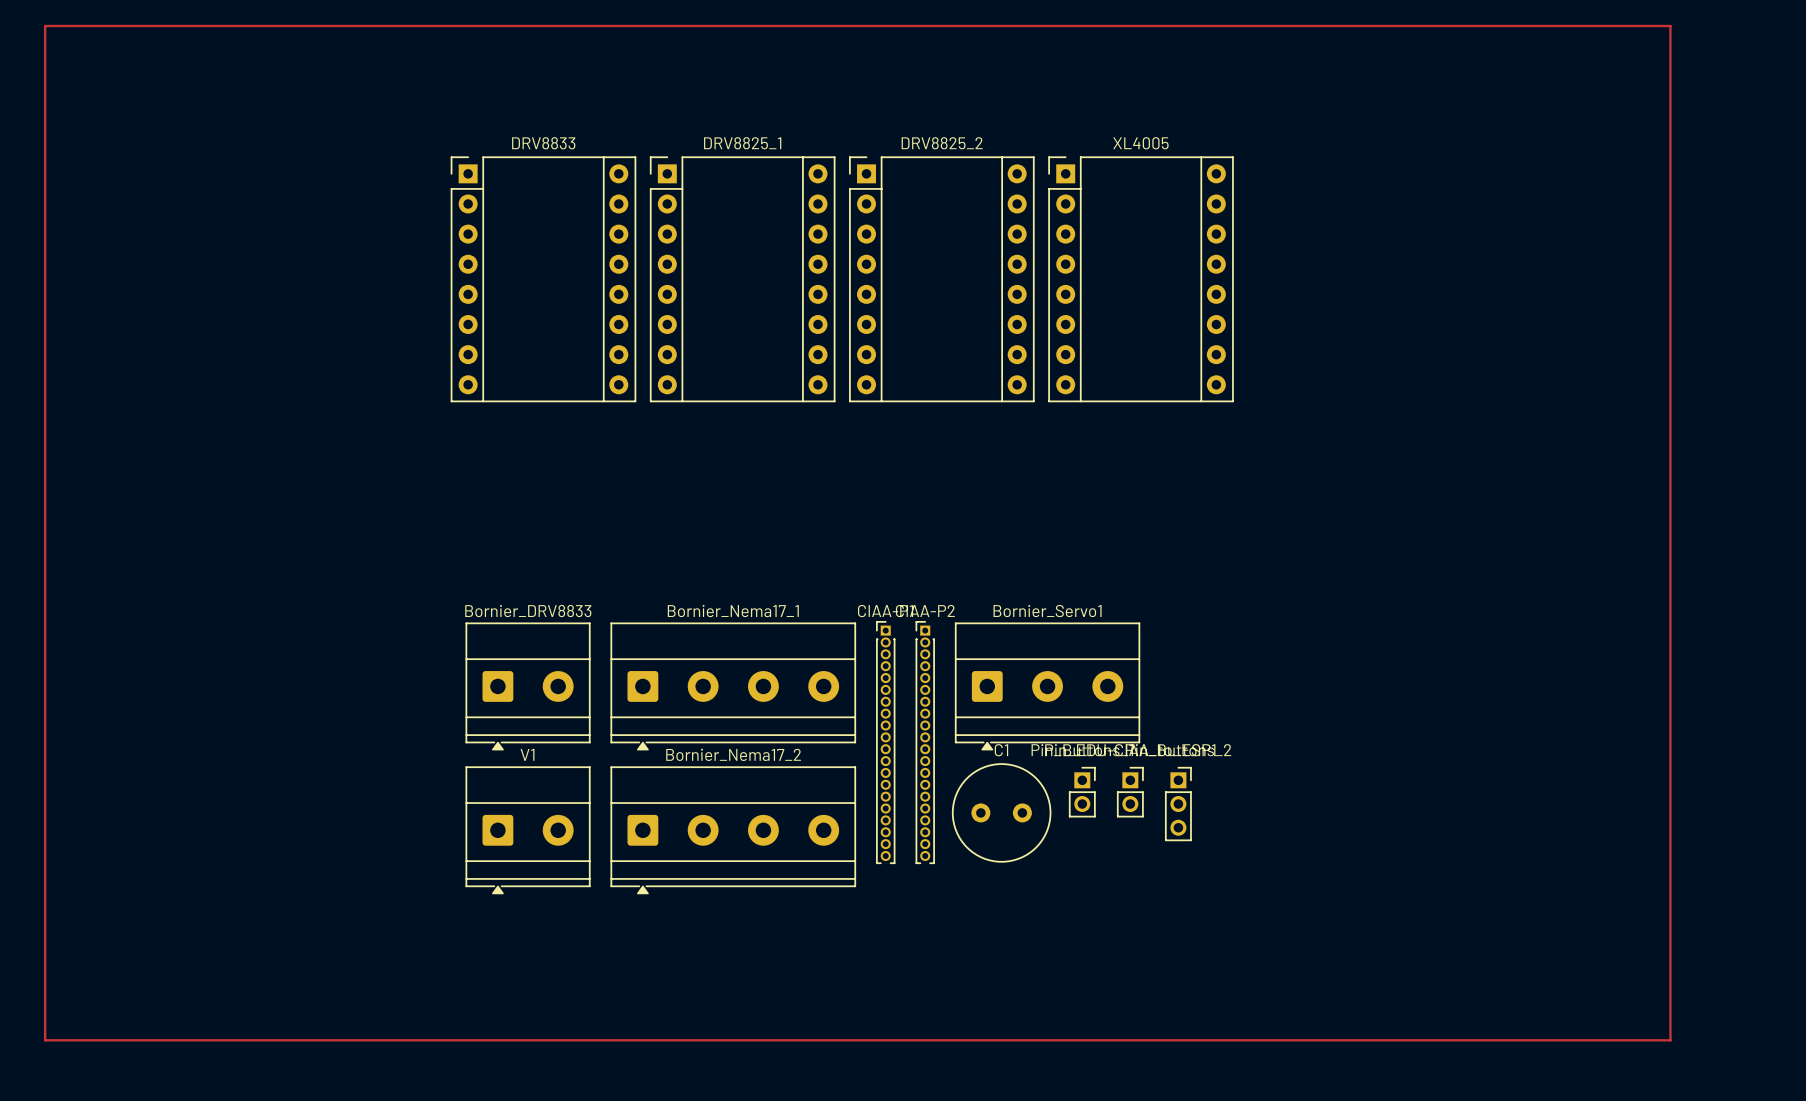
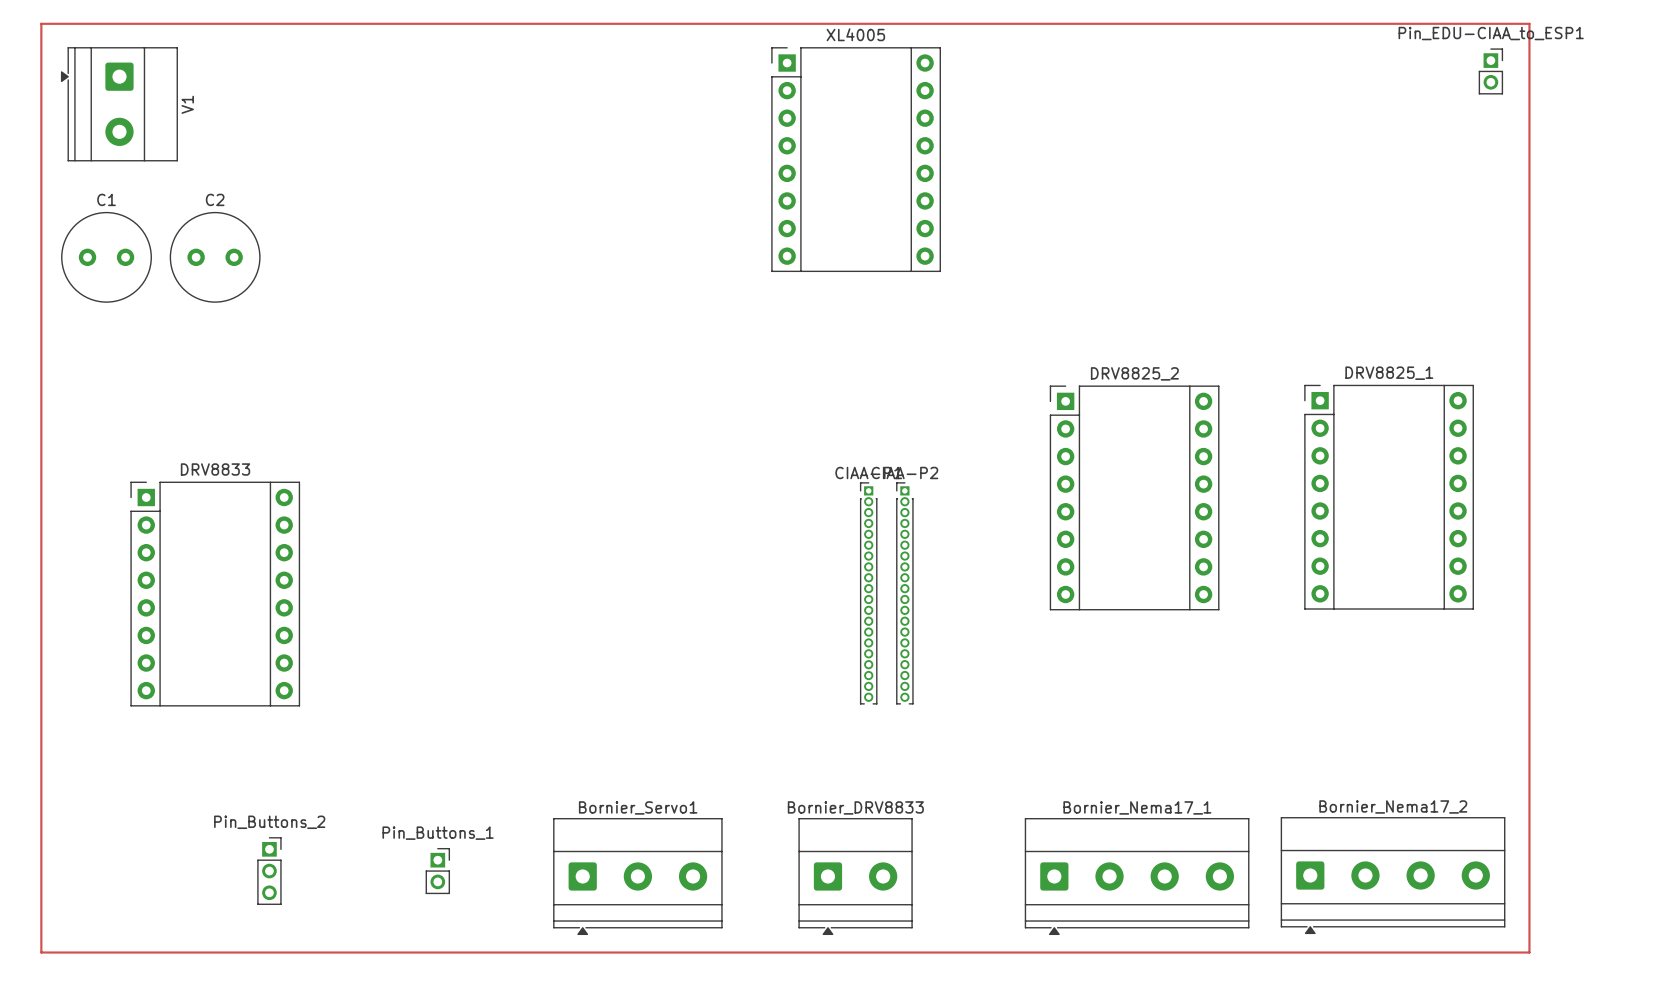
DRV8833 position: (543, 279) -> (215, 594)
DRV8825_1 position: (742, 279) -> (1389, 497)
DRV8825_2 position: (941, 279) -> (1134, 497)
XL4005 position: (1141, 279) -> (856, 159)
C2: none -> (215, 257)
Bornier_DRV8833 position: (528, 686) -> (855, 876)
Bornier_Nema17_1 position: (733, 686) -> (1137, 876)
Bornier_Servo1 position: (1047, 686) -> (637, 876)
CIAA-P1 position: (885, 742) -> (868, 593)
CIAA-P2 position: (925, 742) -> (904, 593)
Pin_Buttons_1 position: (1082, 792) -> (437, 871)
Pin_EDU-CIAA_to_ESP1 position: (1130, 792) -> (1490, 71)
Pin_Buttons_2 position: (1178, 804) -> (269, 871)
C1 position: (1001, 812) -> (106, 257)
V1 rotation: 0° (528, 830) -> 90° clockwise (119, 104)
V1 position: (528, 830) -> (119, 104)
Bornier_Nema17_2 position: (733, 830) -> (1393, 875)

